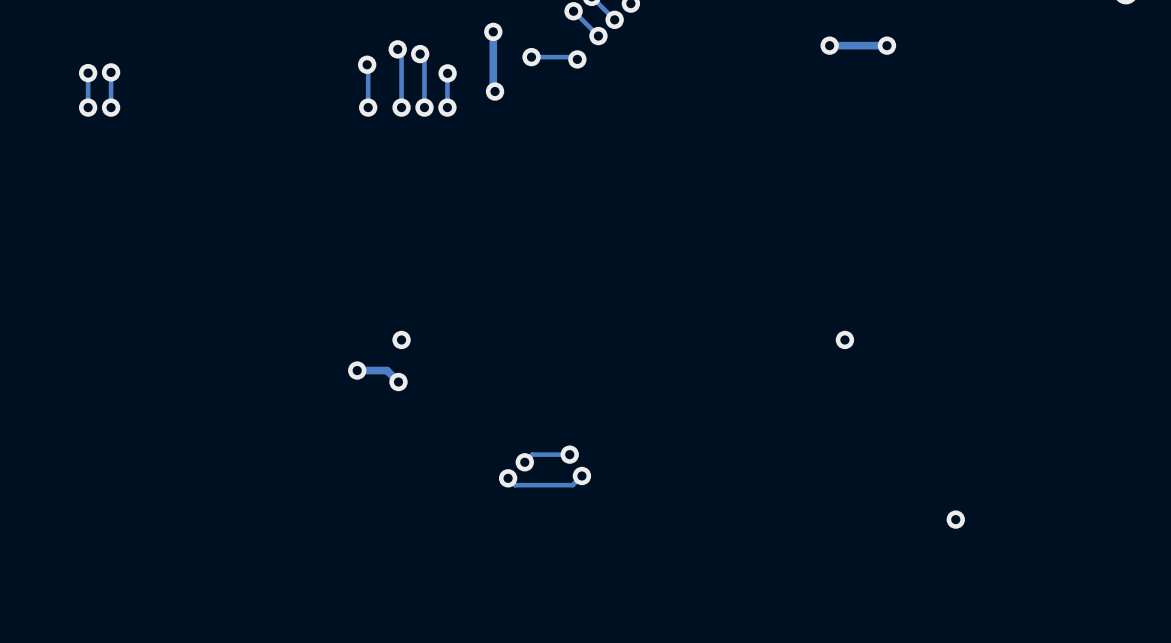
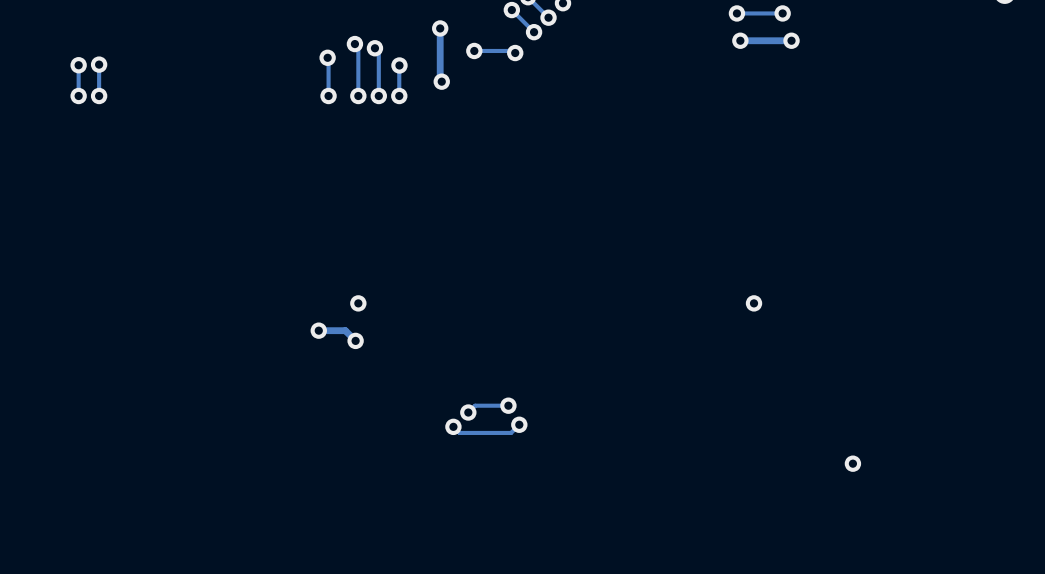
via: none -> (736, 13)
track: none -> (782, 13) (736, 13)
via: none -> (782, 13)

